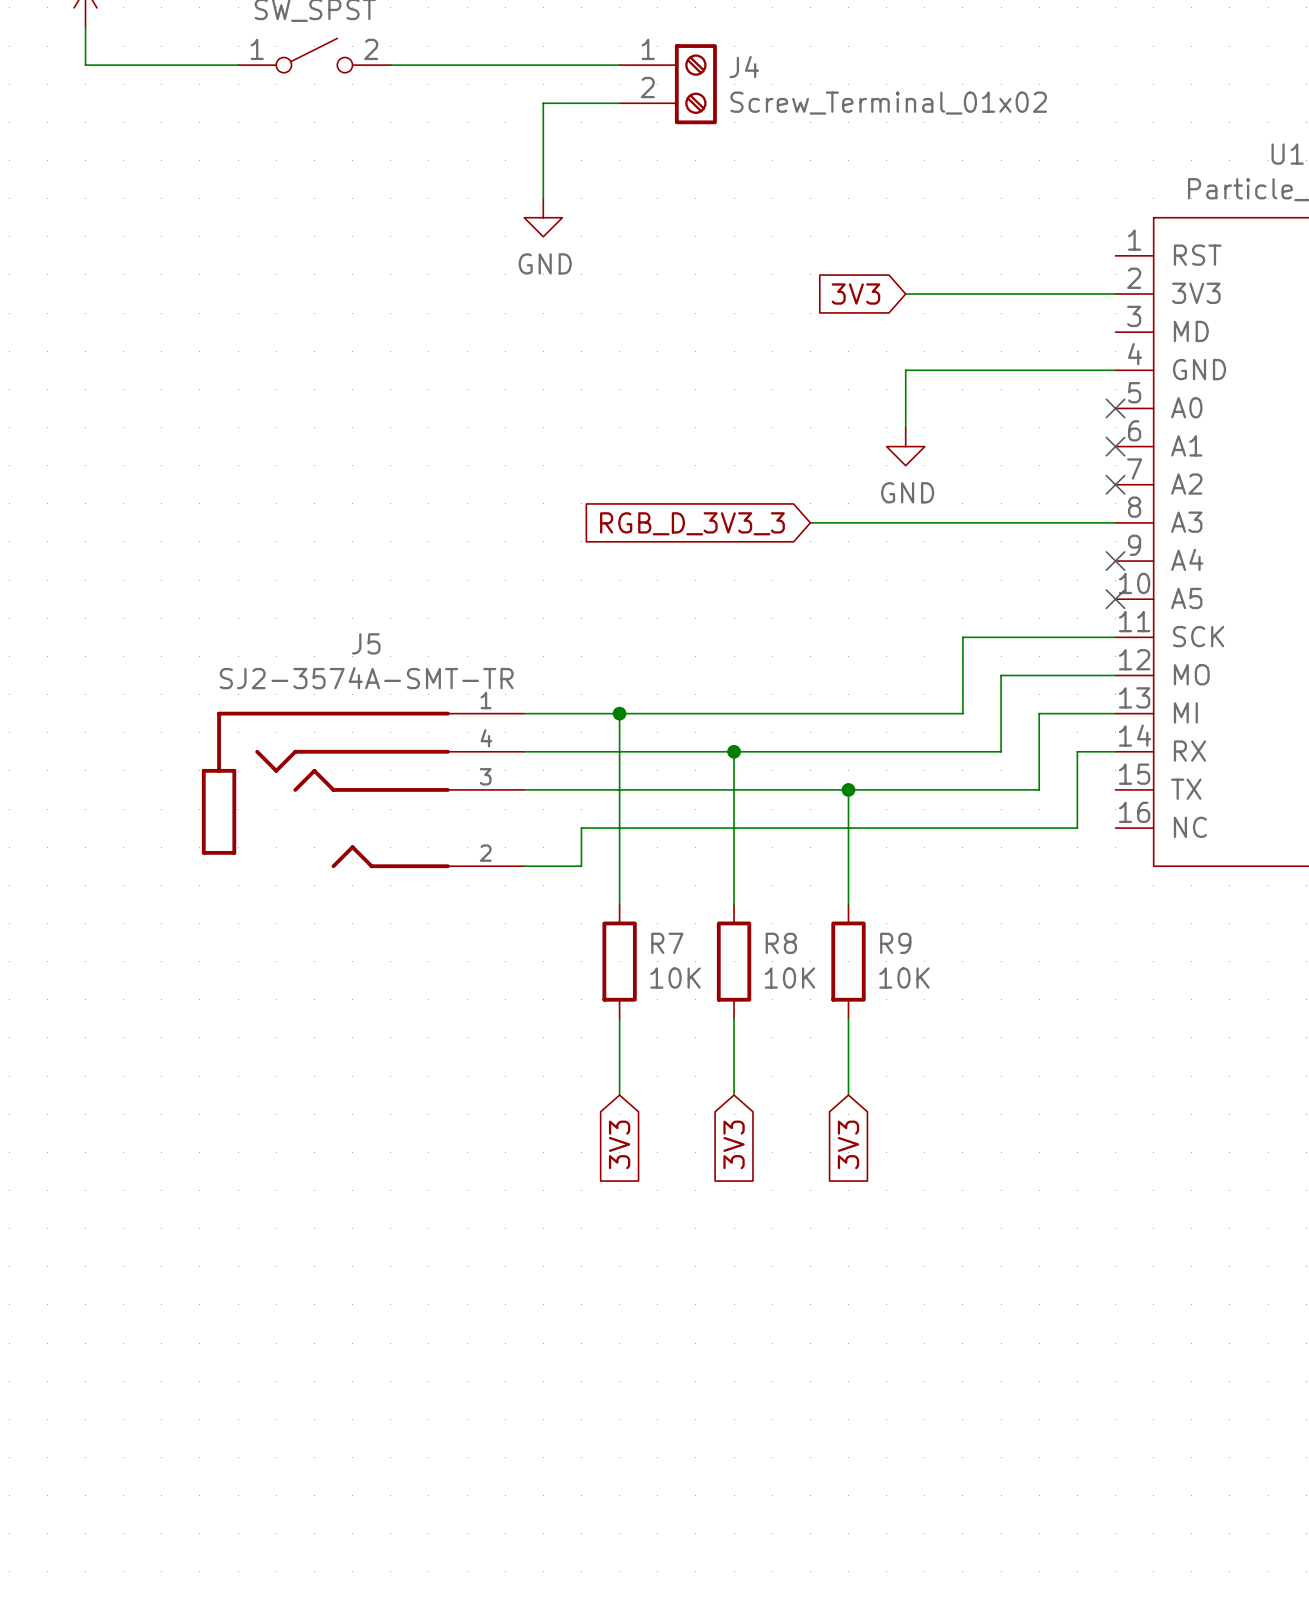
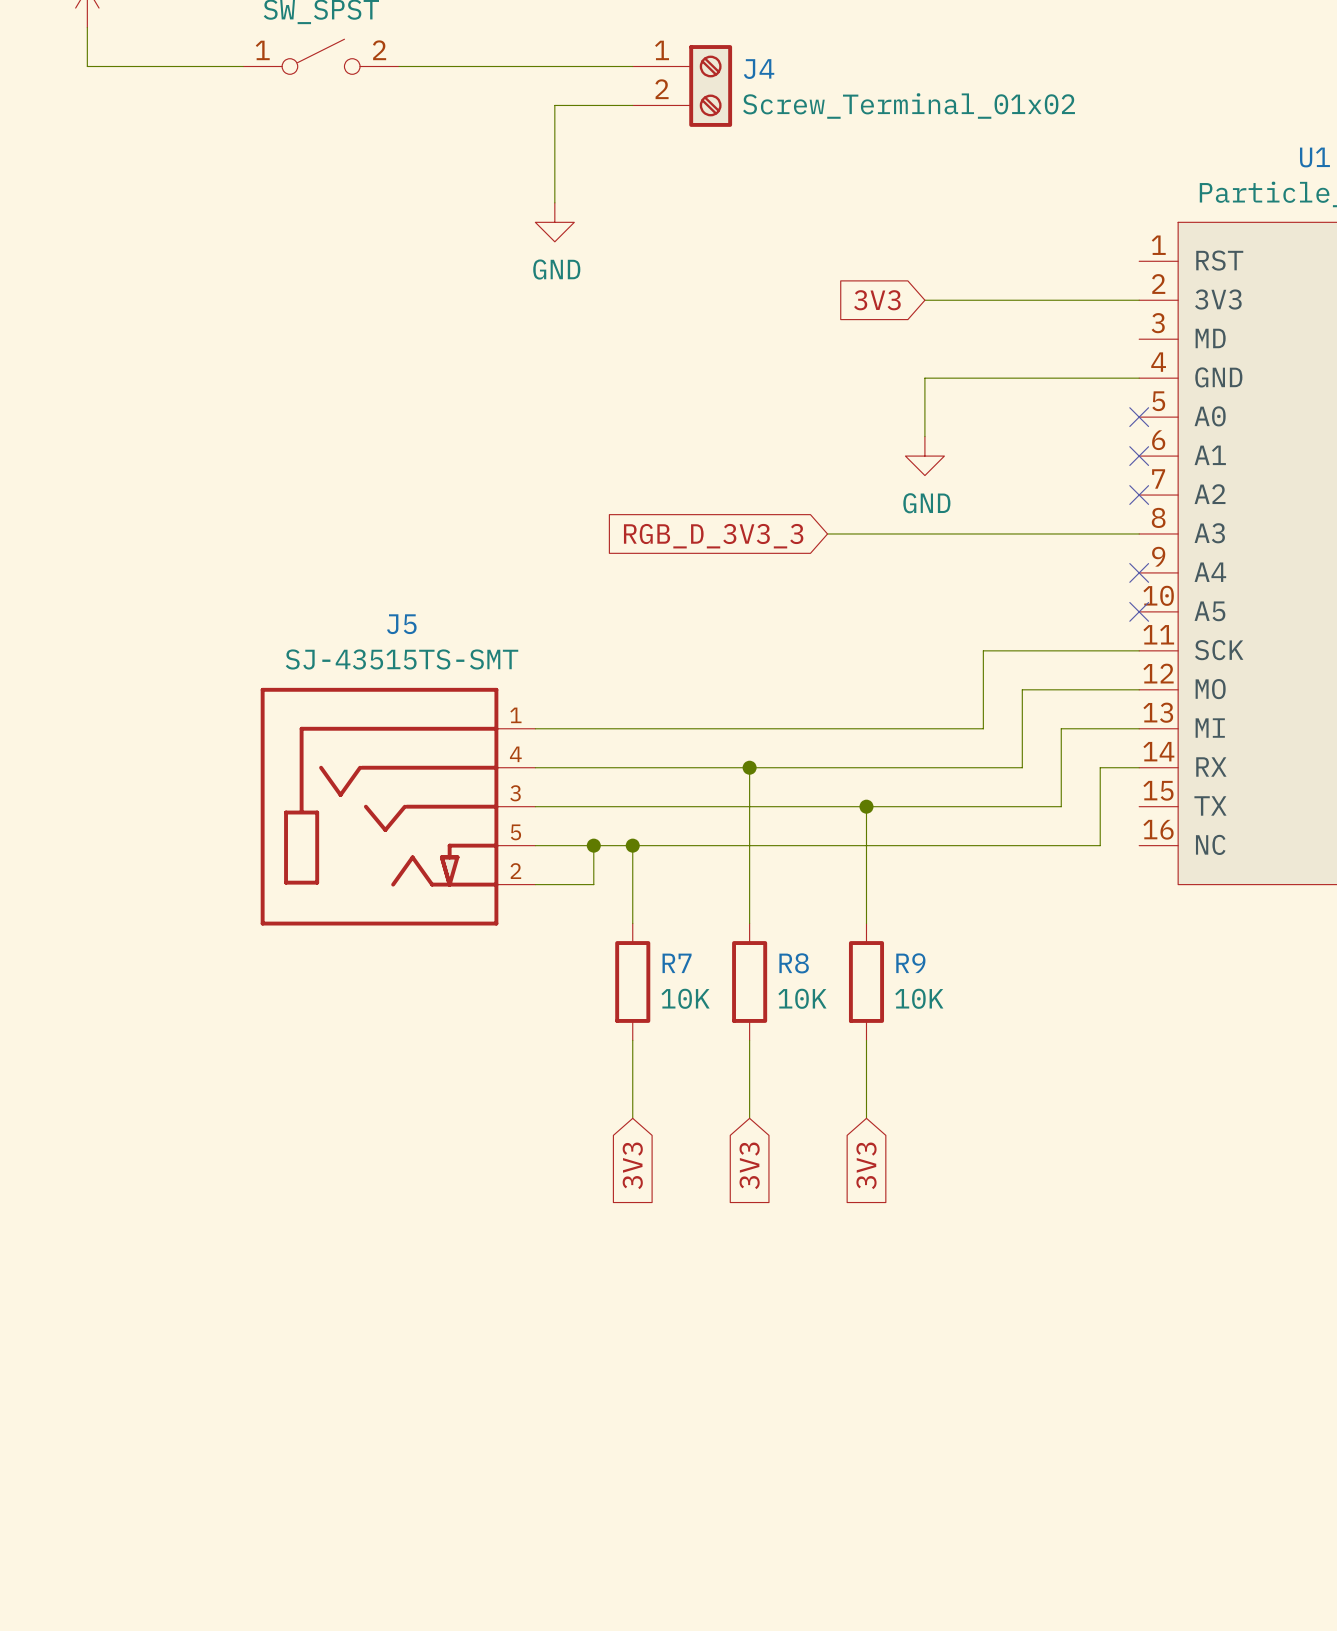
J5 name position: J5 (366, 643) -> J5 (401, 624)
J5 value: SJ2-3574A-SMT-TR (366, 678) -> SJ-43515TS-SMT (402, 659)
J5 symbol: [201, 711, 525, 869] -> [260, 687, 536, 926]
wire: (619, 713) (619, 828) -> none
junction: (619, 713) -> none
wire: none -> (535, 845) (593, 845)
junction: none -> (593, 845)
junction: none -> (632, 845)

